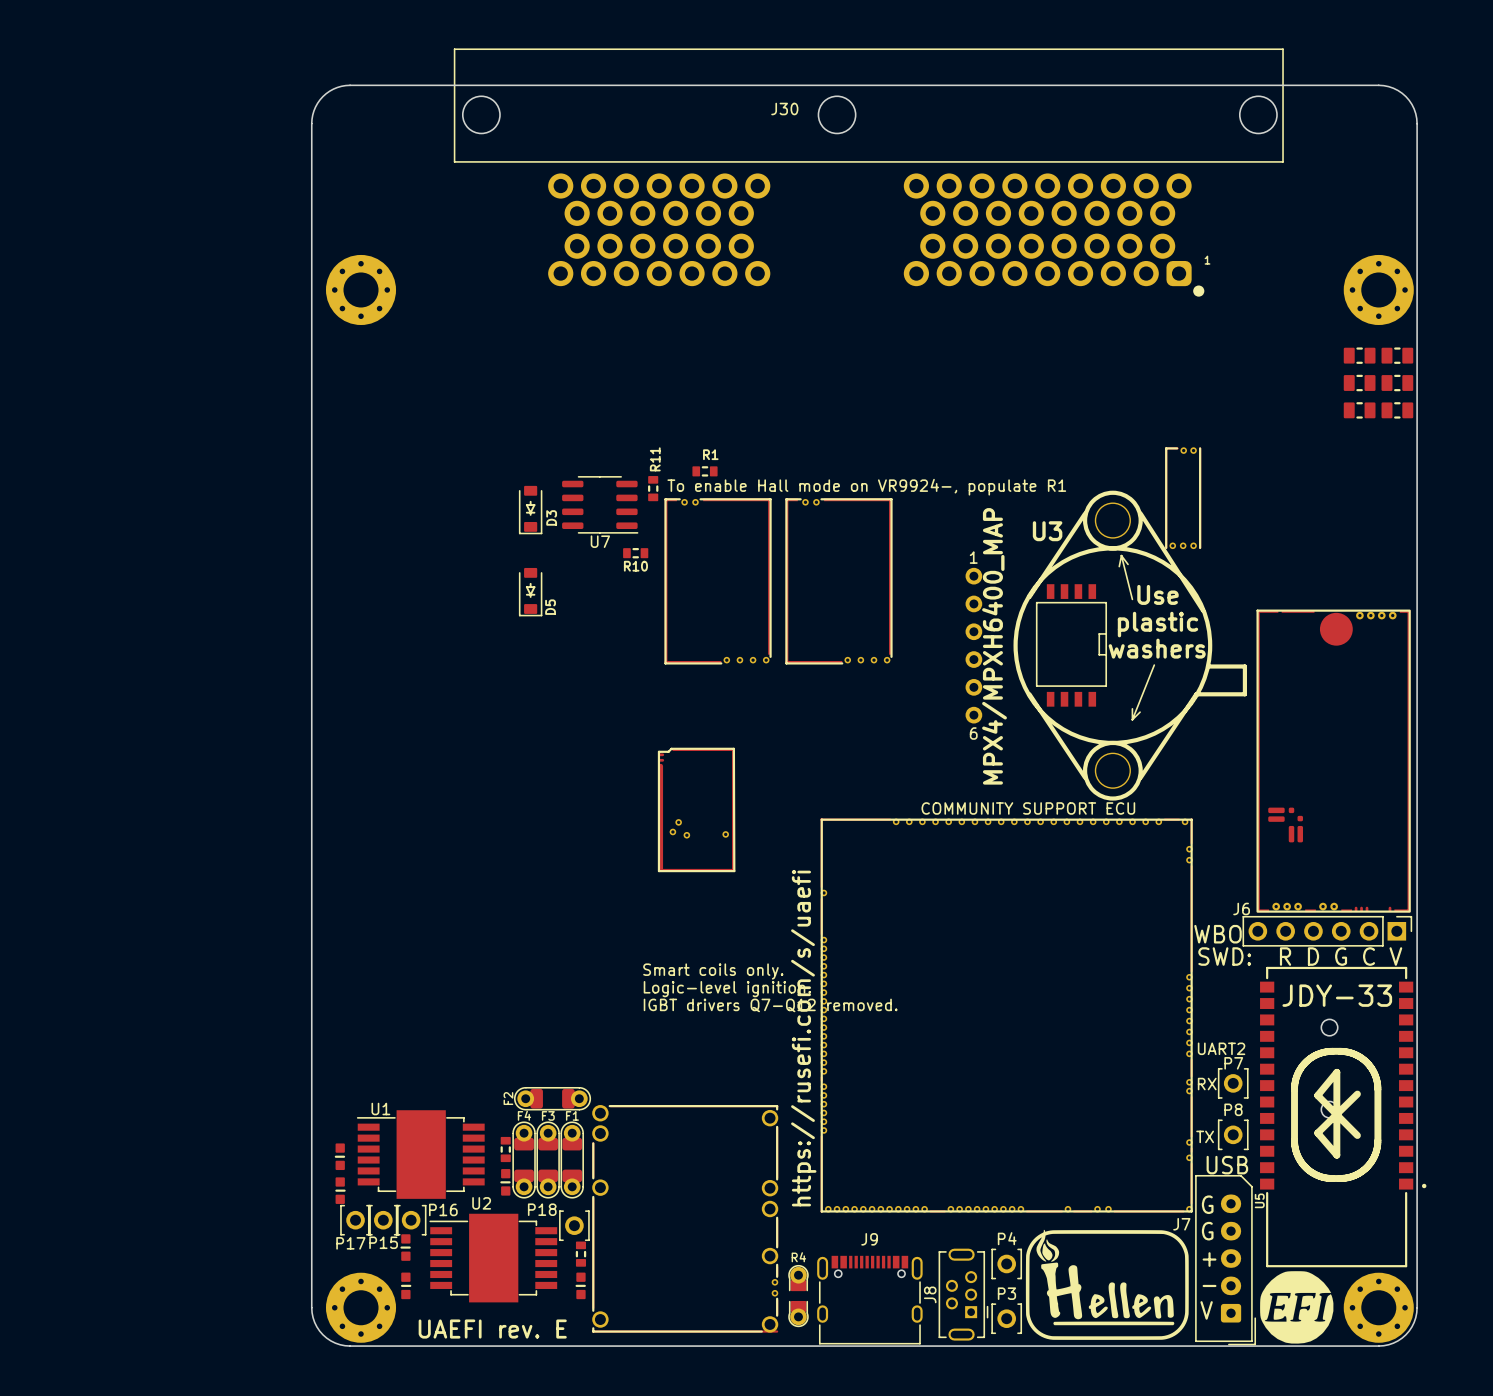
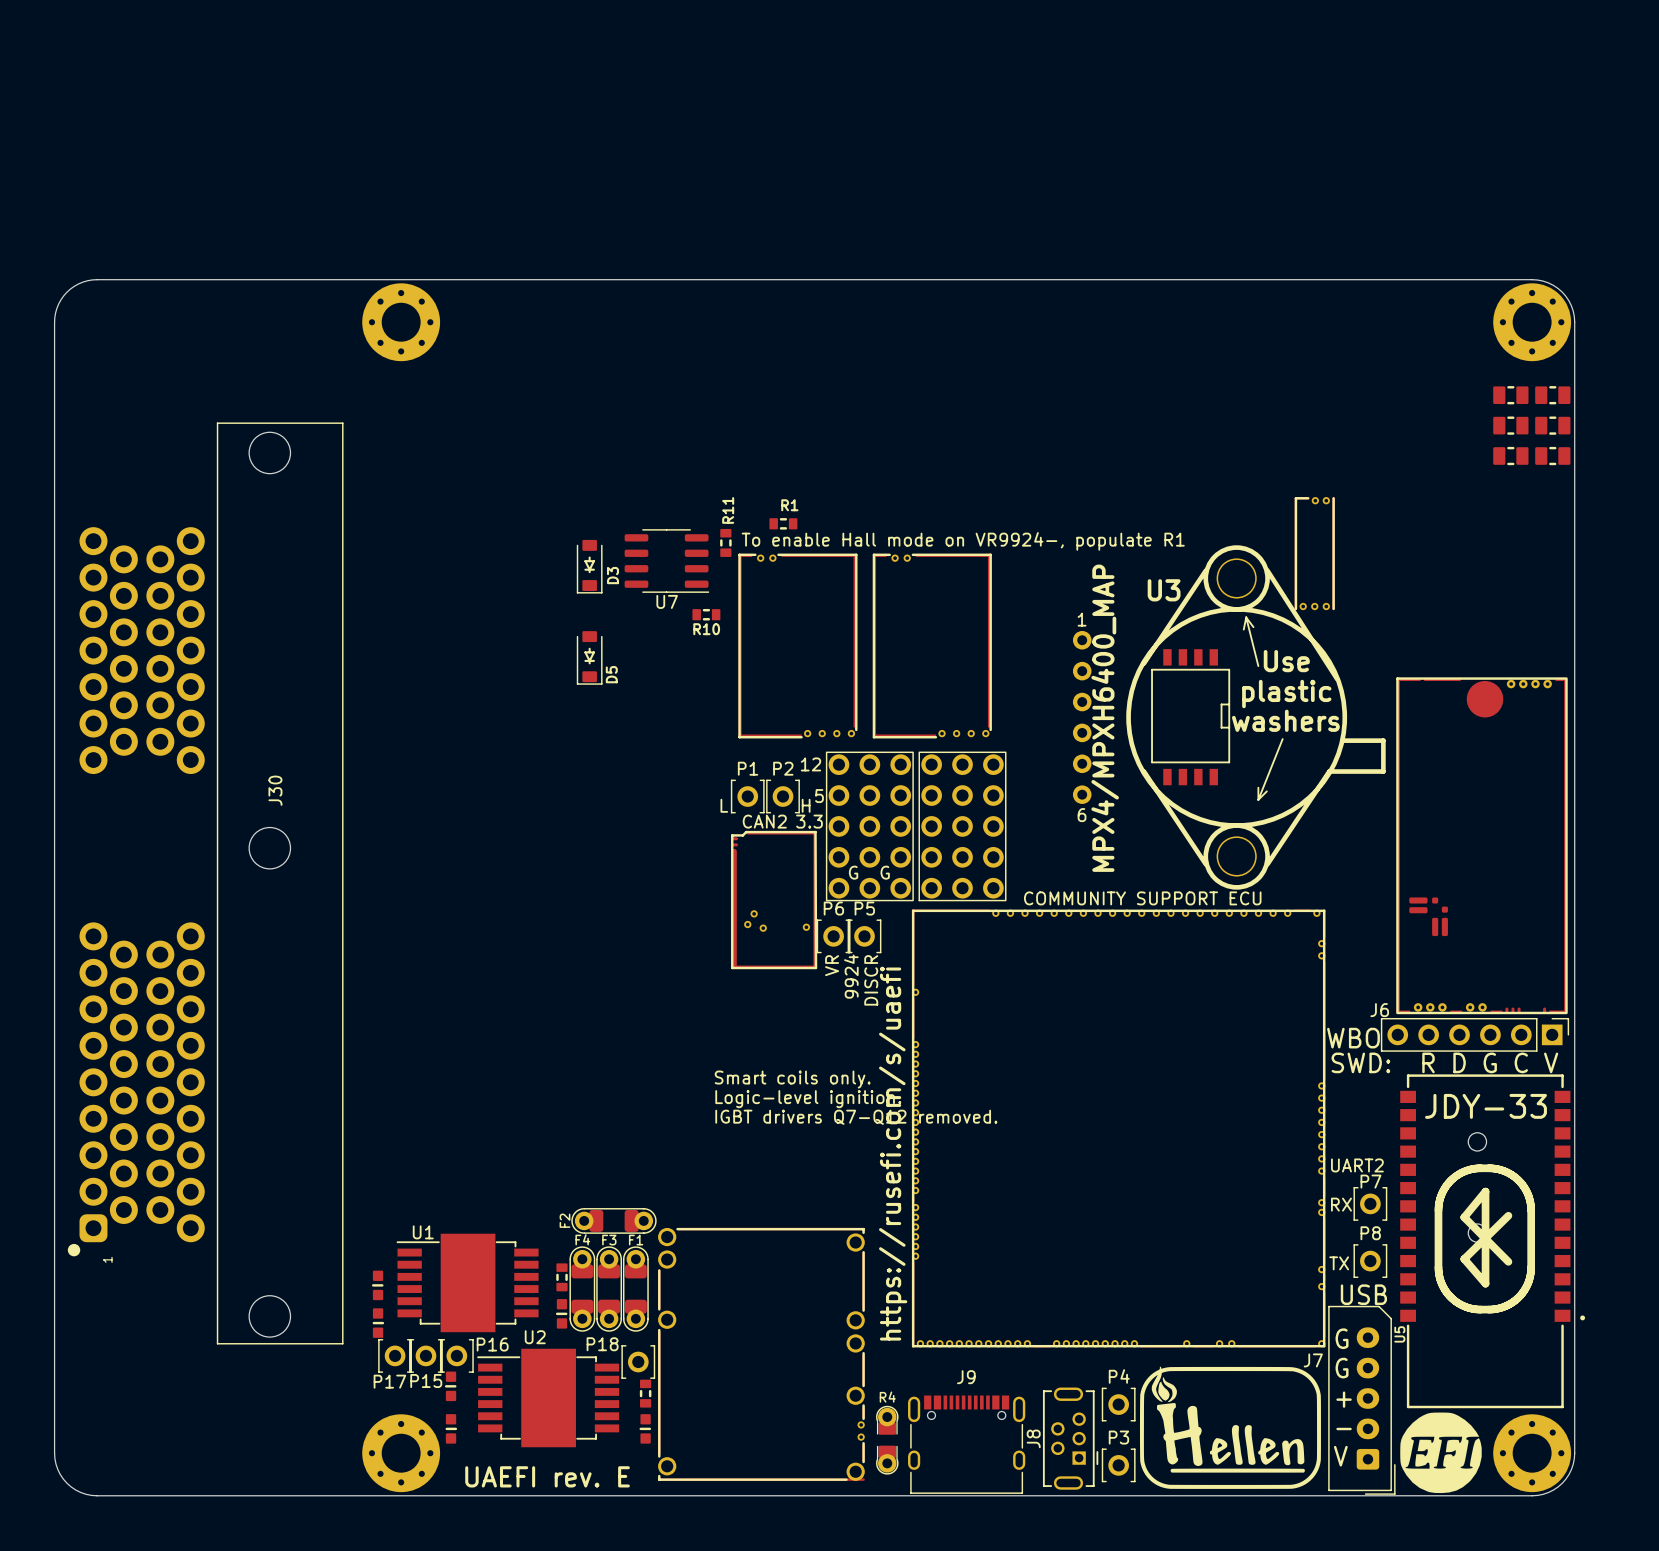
J30 rotation: 0° (868, 172) -> 90° clockwise (205, 883)
J30 position: (868, 172) -> (205, 883)
board edge: (1417, 289) (1416, 118) (1411, 104) (1405, 96) (1393, 88) (1383, 85) (350, 85) (333, 89) (322, 96) (313, 110) (311, 123) (311, 1307) (314, 1322) (322, 1334) (335, 1343) (350, 1346) -> (1574, 322) (1571, 305) (1562, 292) (1548, 282) (1532, 279) (97, 279) (78, 283) (67, 292) (56, 308) (54, 322) (56, 1464) (67, 1483) (75, 1490) (91, 1495) (389, 1495)
text: none -> 12 (810, 764)
P1: none -> (747, 796)
P2: none -> (783, 796)
text: none -> 5 (819, 796)
text: none -> L (724, 805)
text: none -> H (806, 805)
text: none -> CAN2 (764, 821)
text: none -> 3.3 (809, 821)
part: none -> (869, 826)
part: none -> (962, 826)
text: none -> G (853, 872)
text: none -> G (885, 872)
P6: none -> (833, 936)
P5: none -> (864, 936)
text: none -> VR (832, 965)
text: none -> 9924 (851, 976)
text: none -> DISCR (871, 980)

